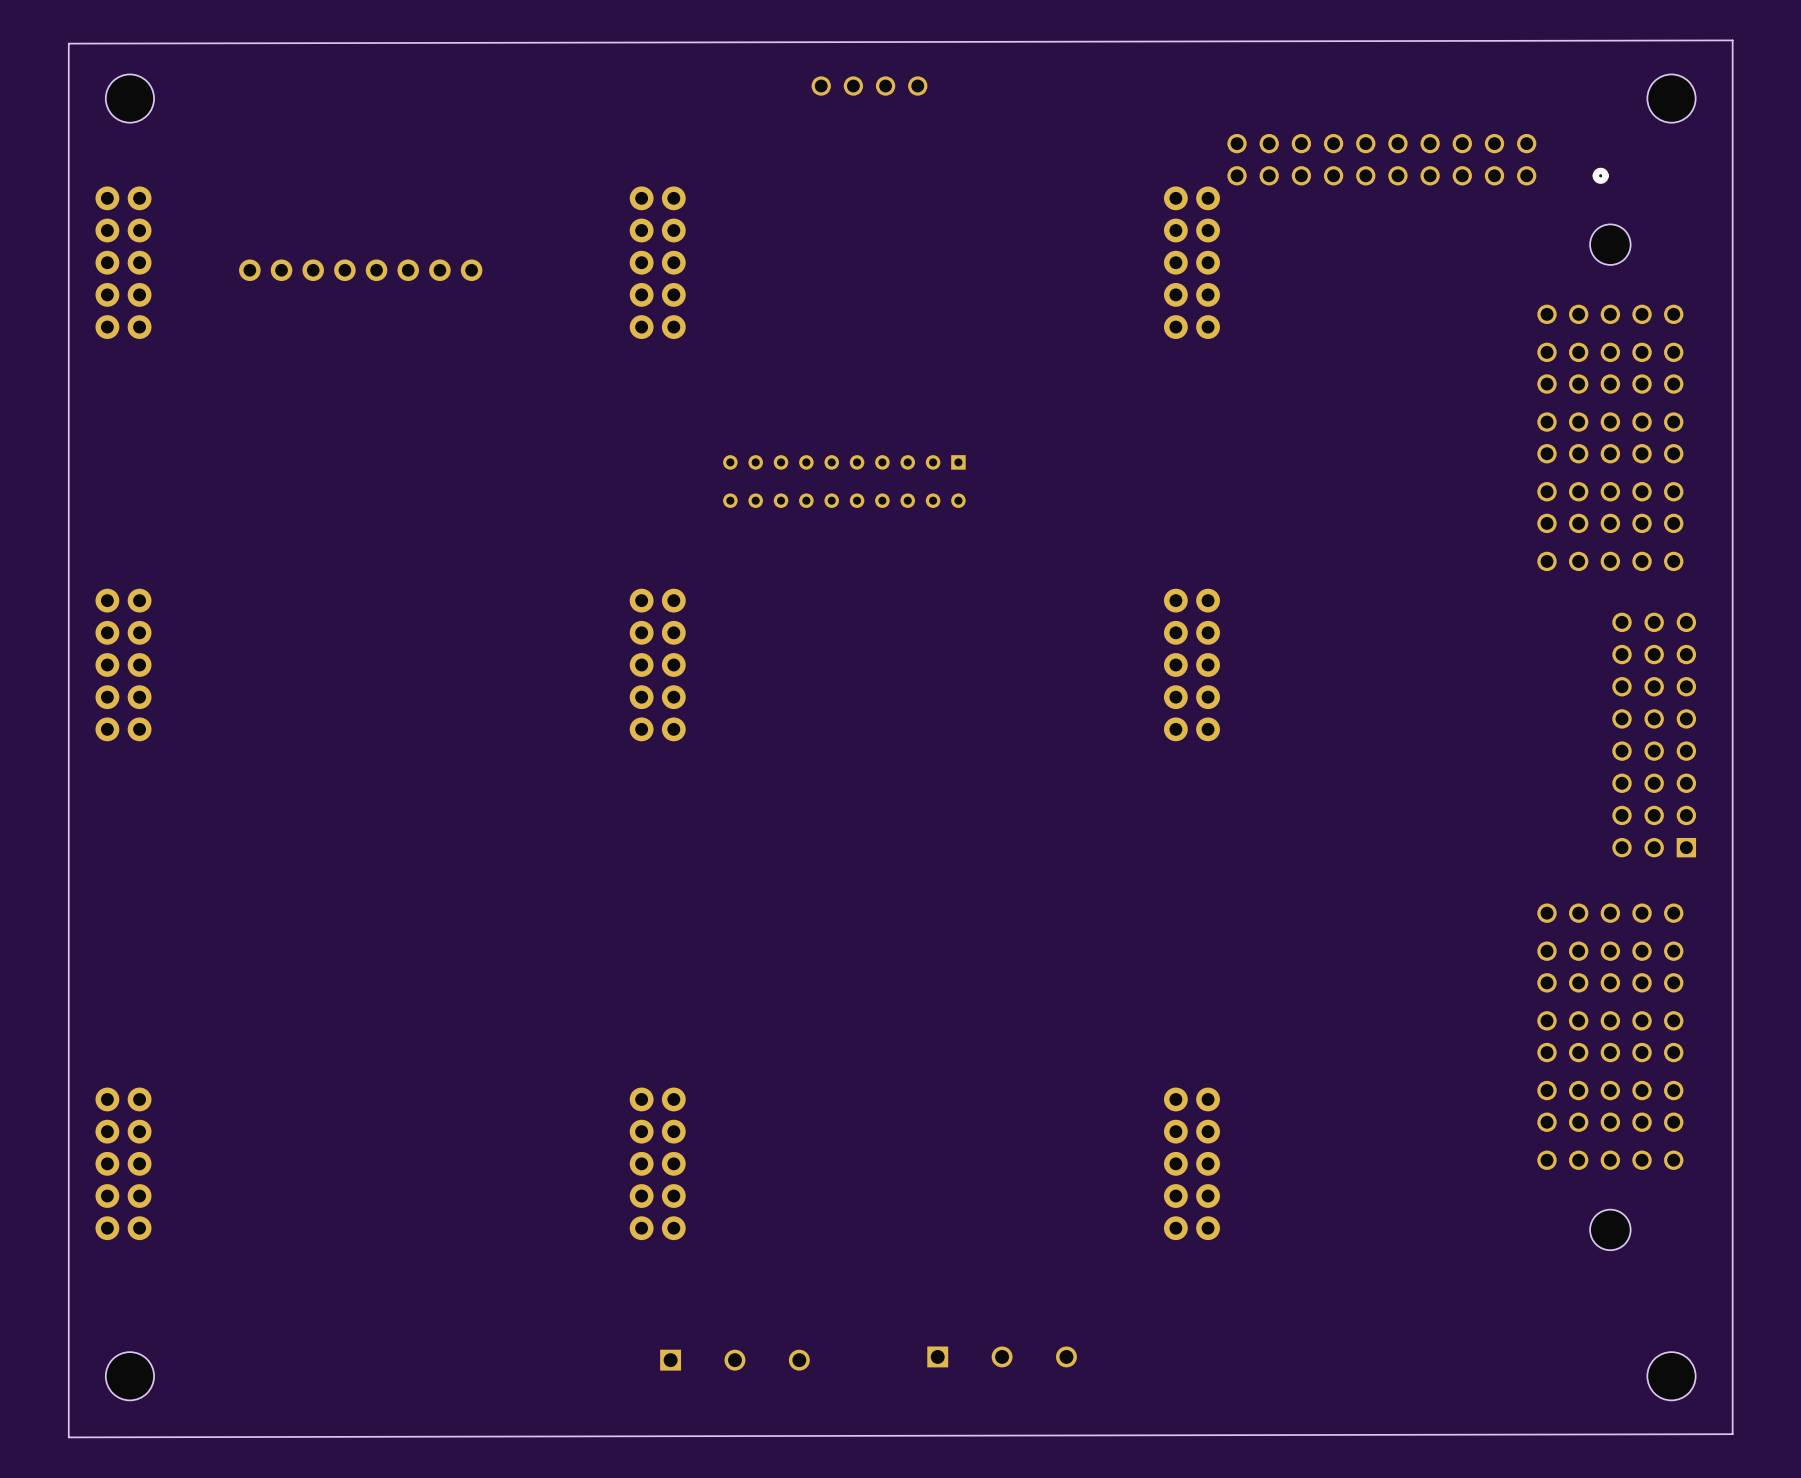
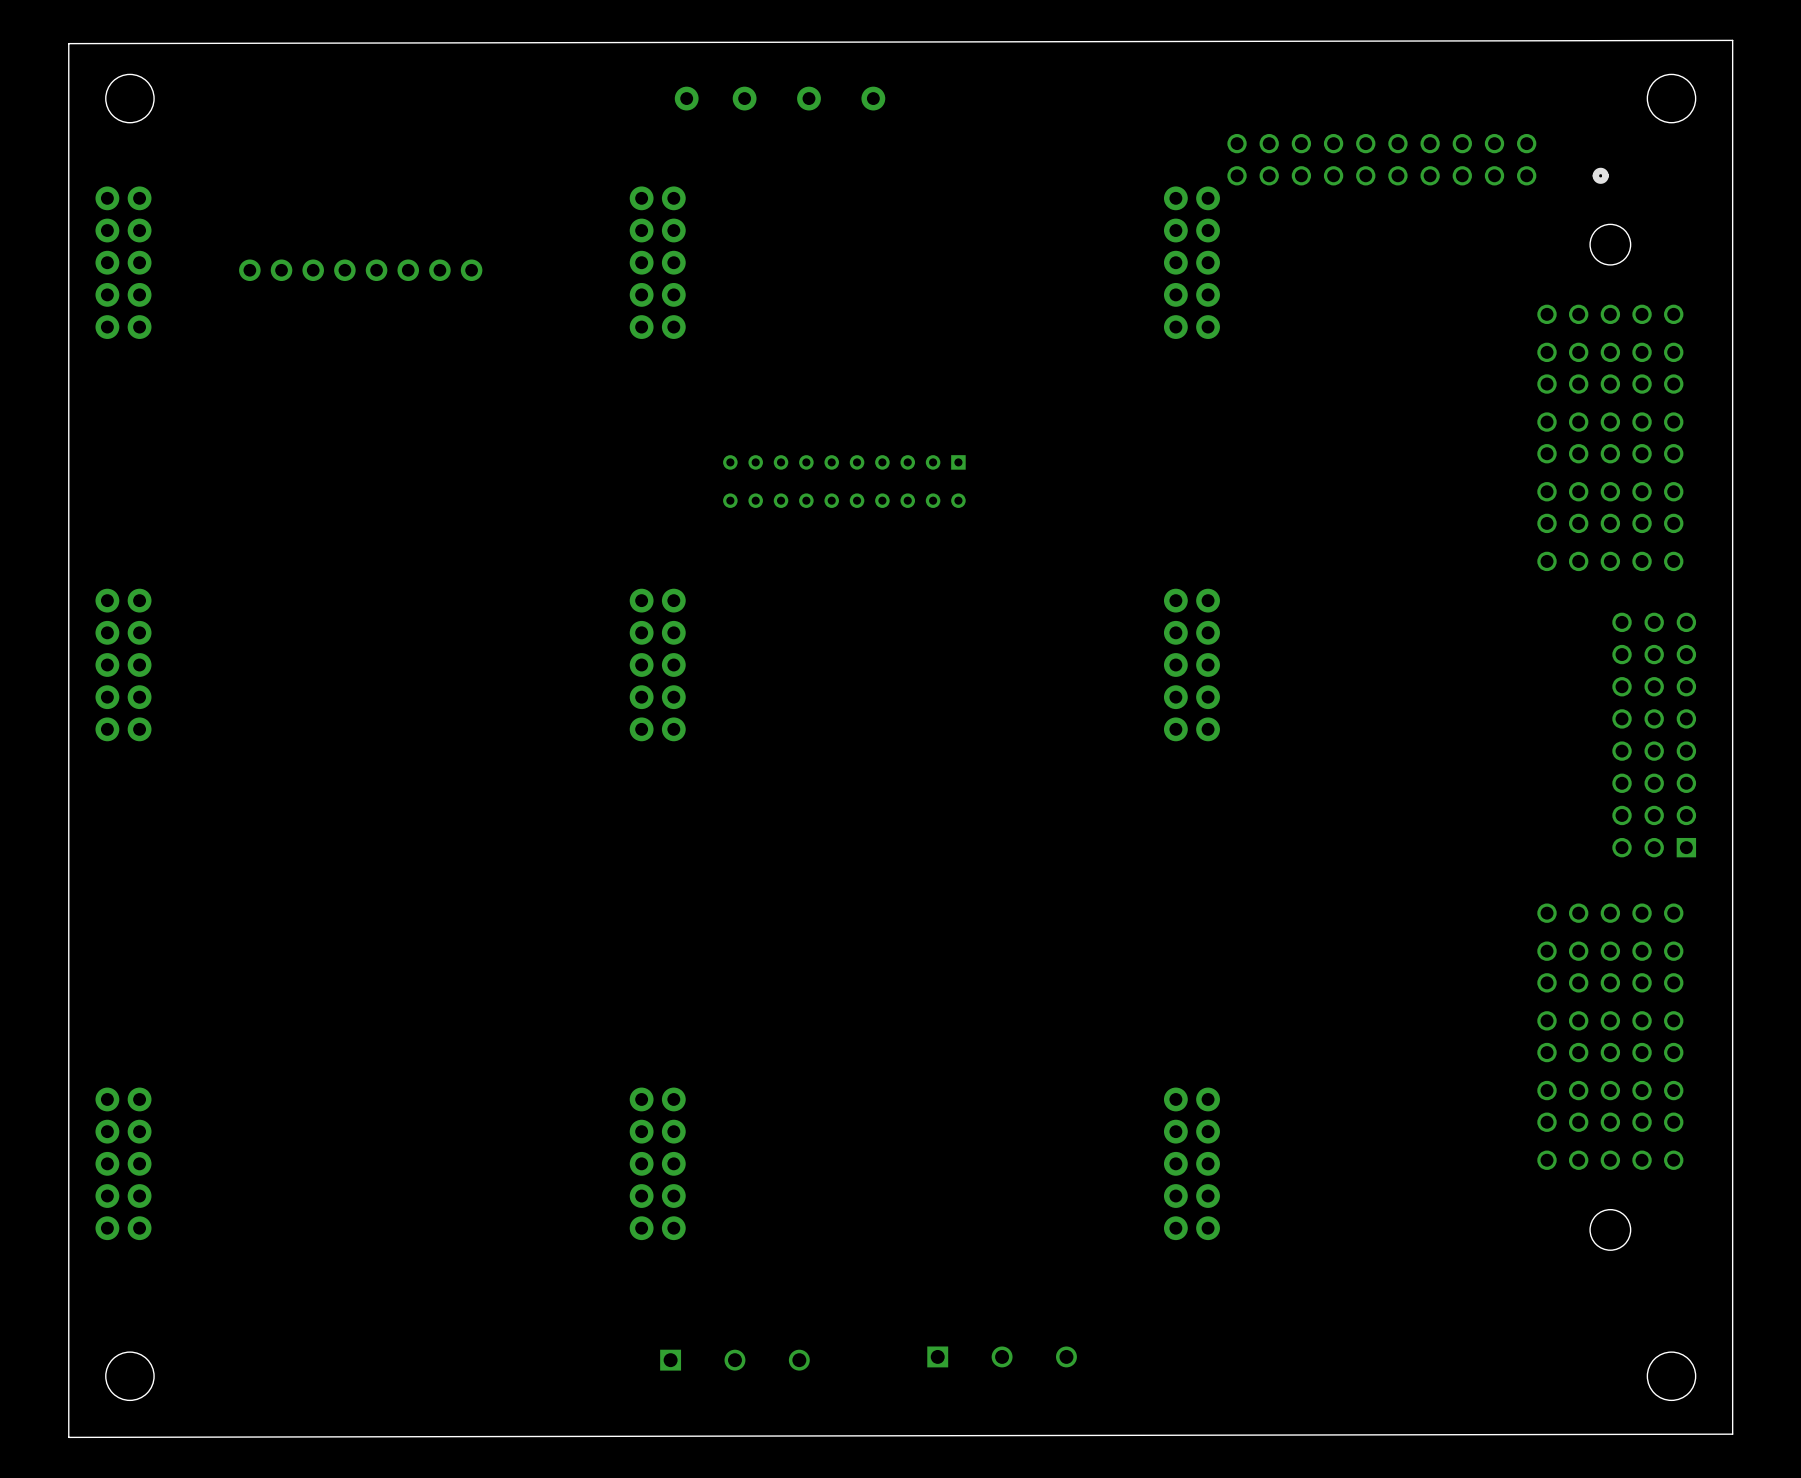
part: (869, 86) -> none
part: none -> (686, 98)
part: none -> (744, 98)
part: none -> (808, 98)
part: none -> (873, 98)

